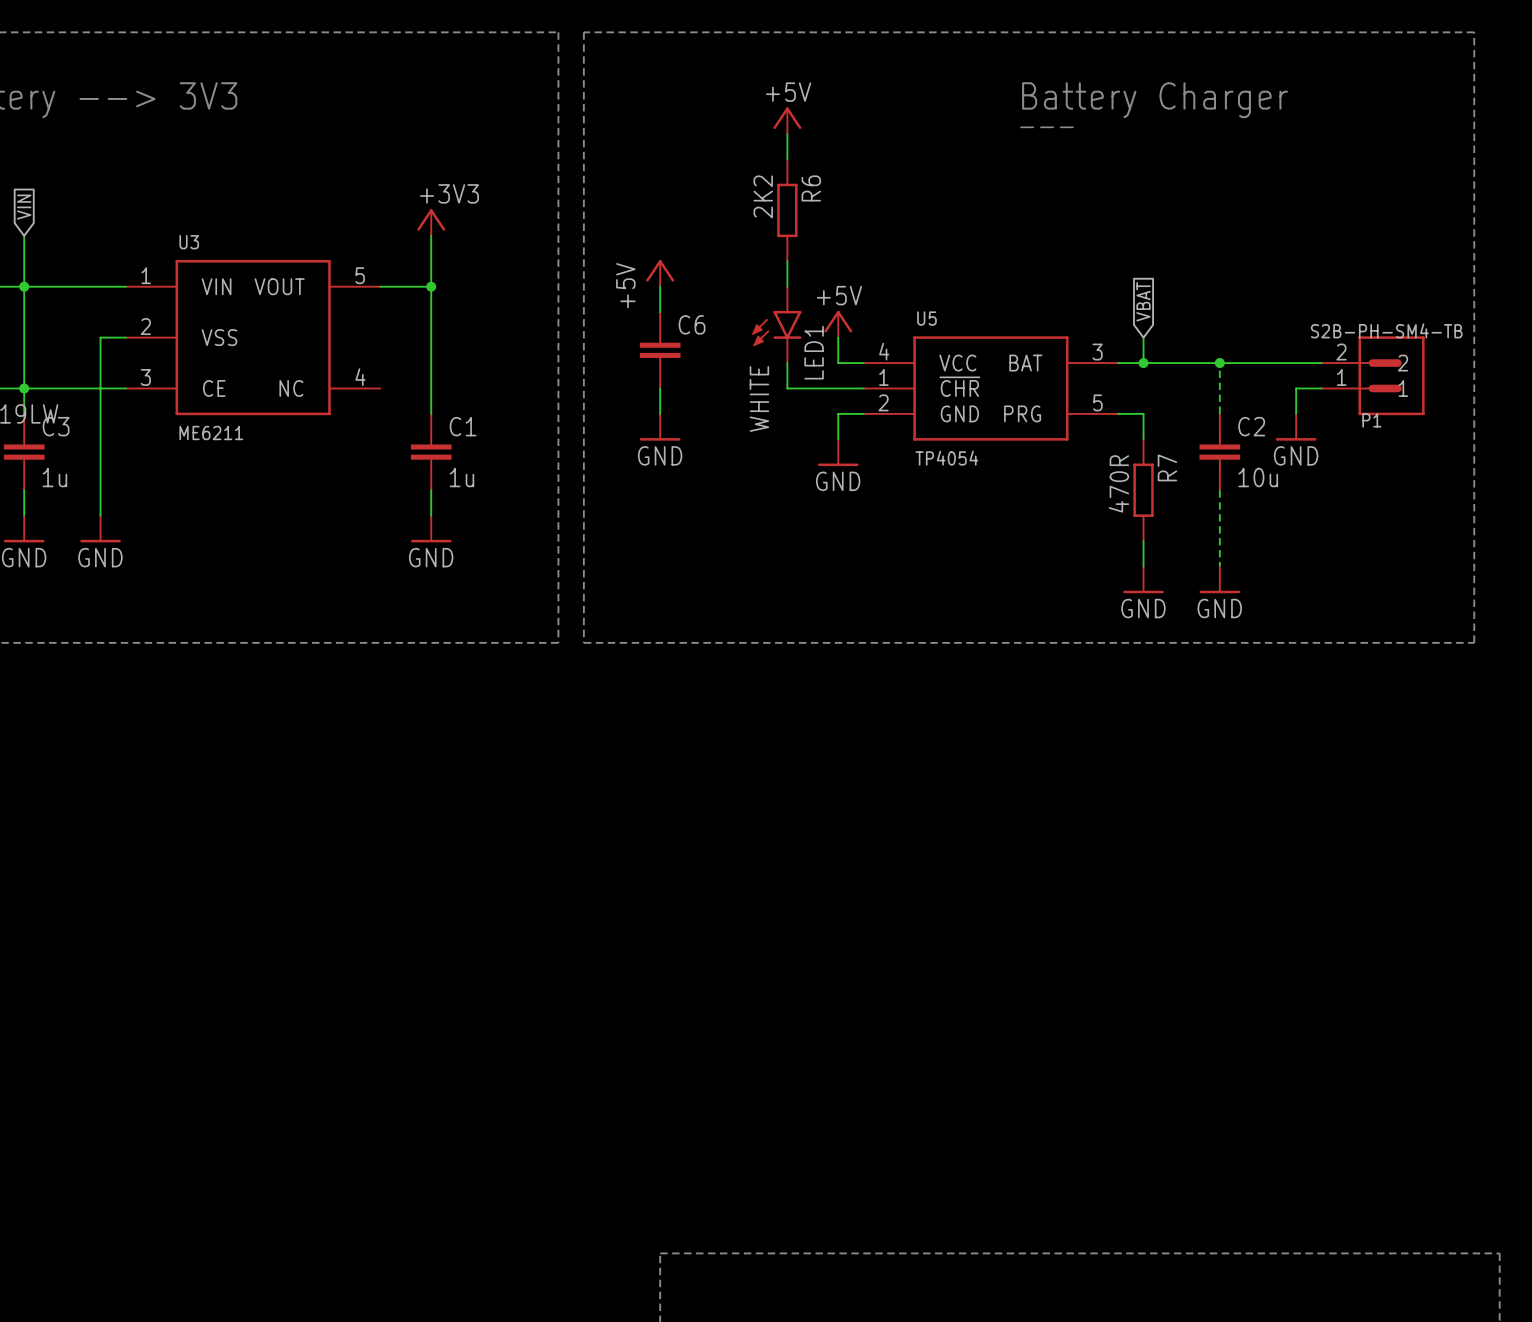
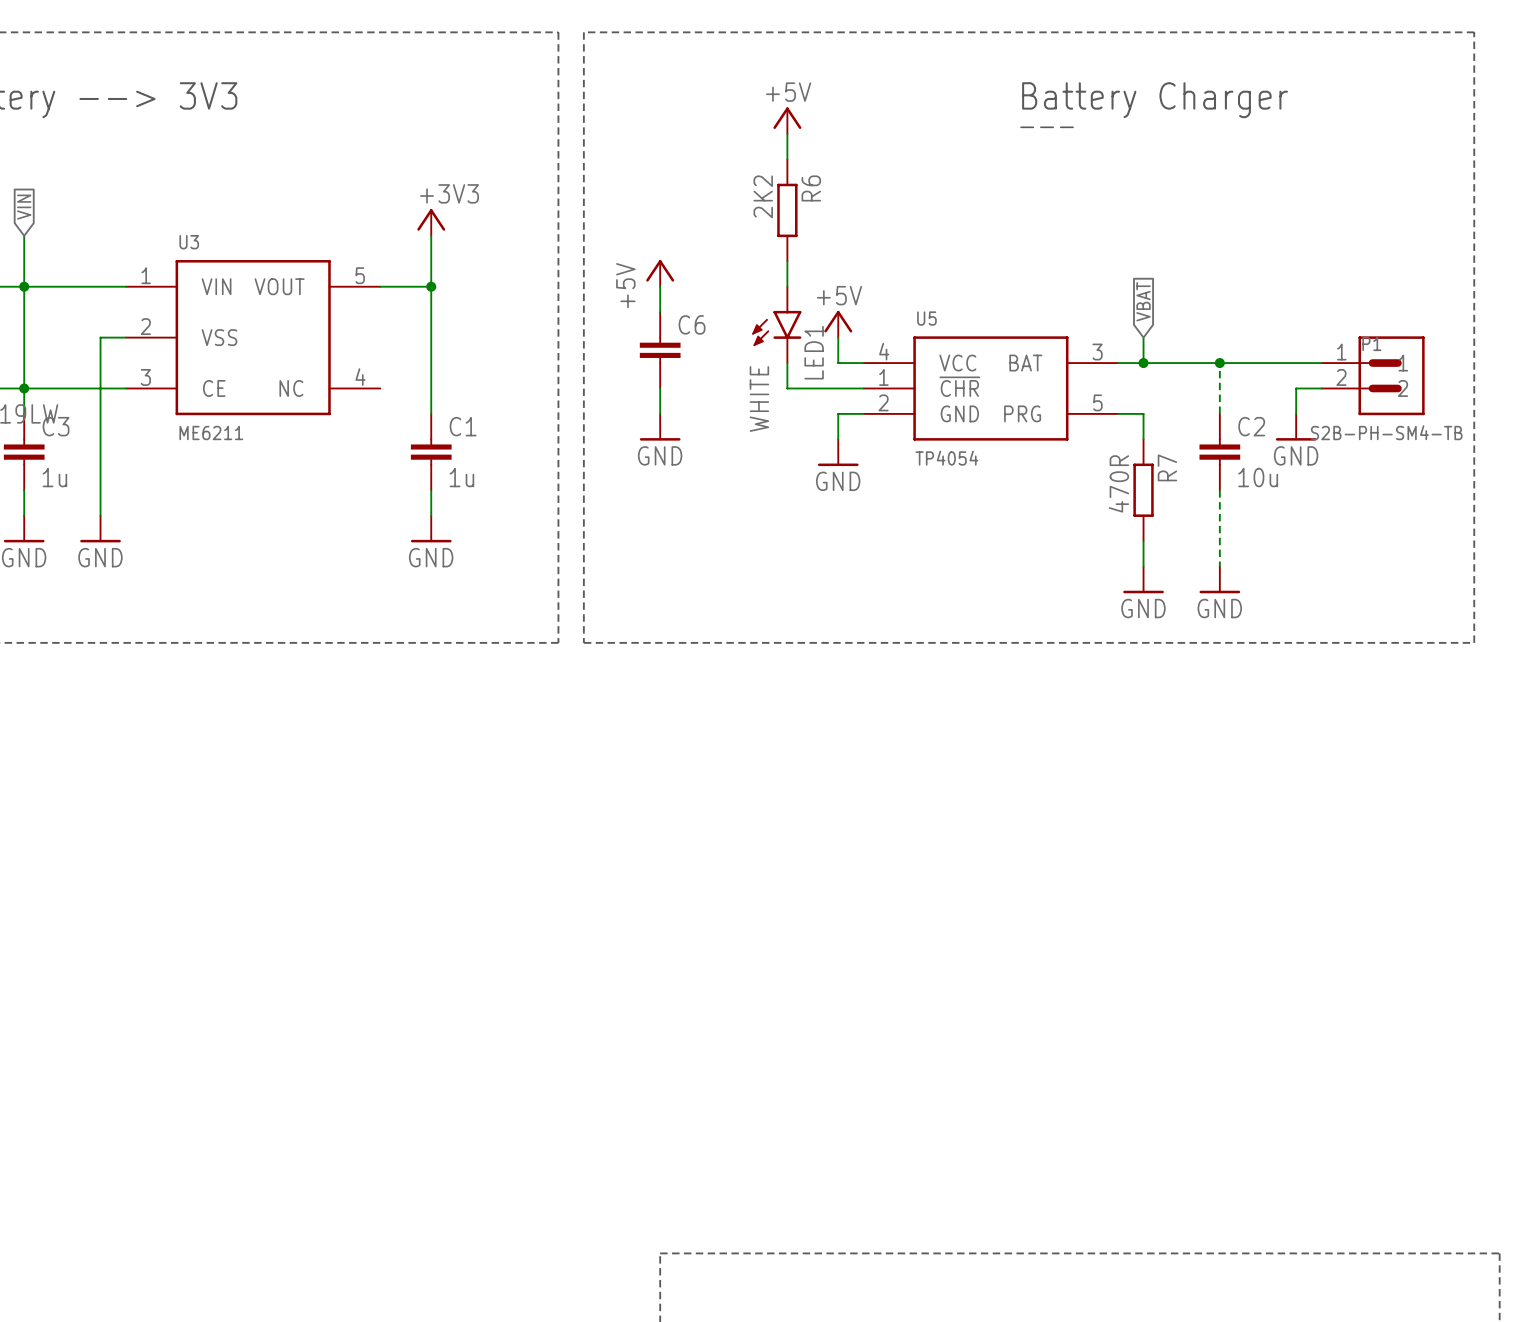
P1 flip: as is (1391, 375) -> up-down (1391, 375)

